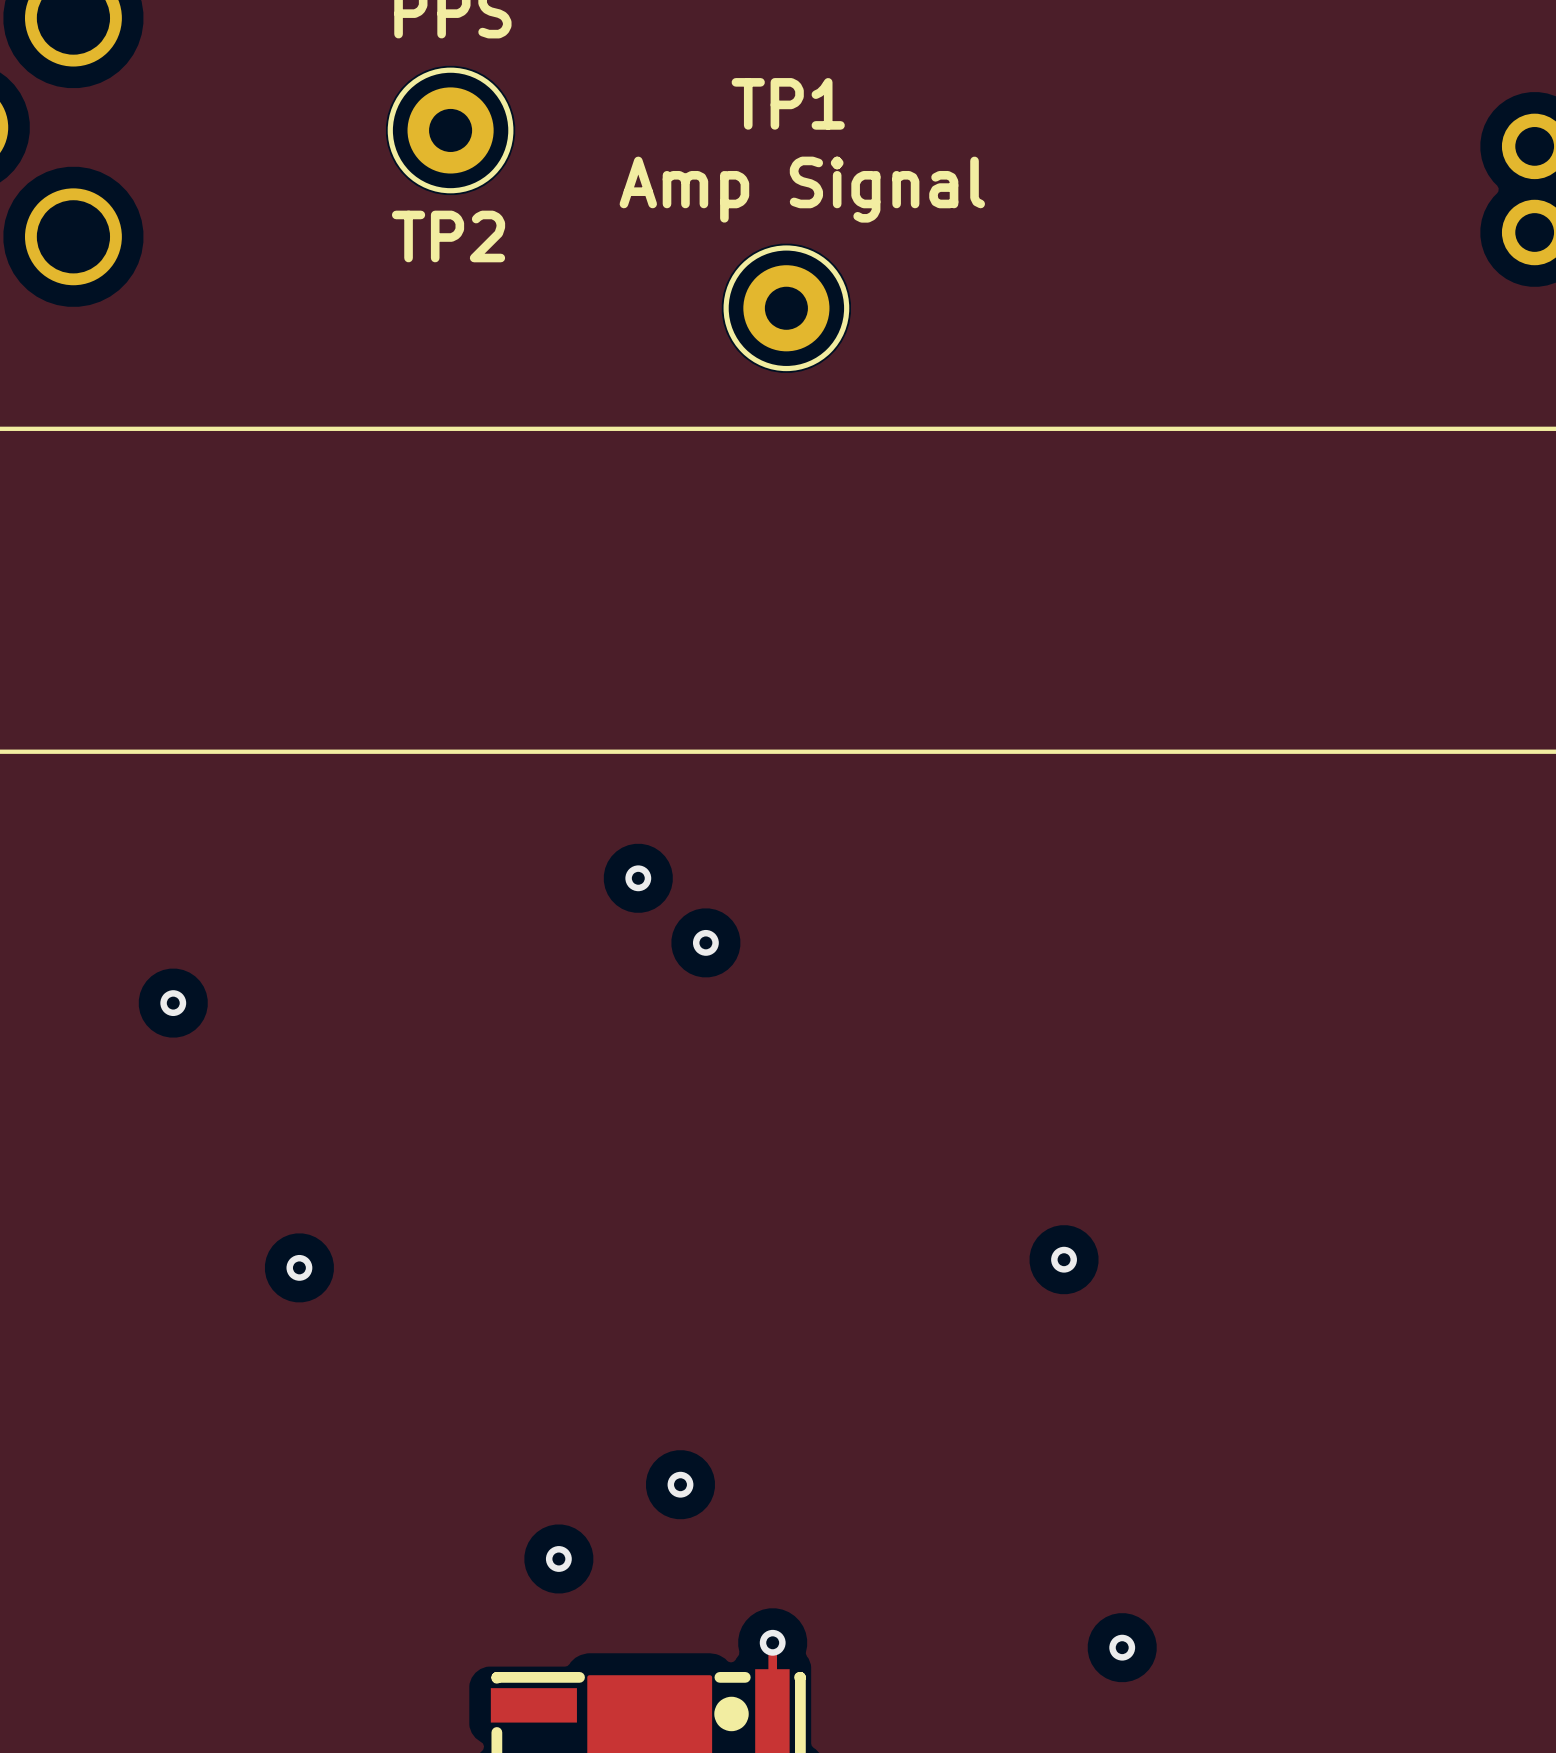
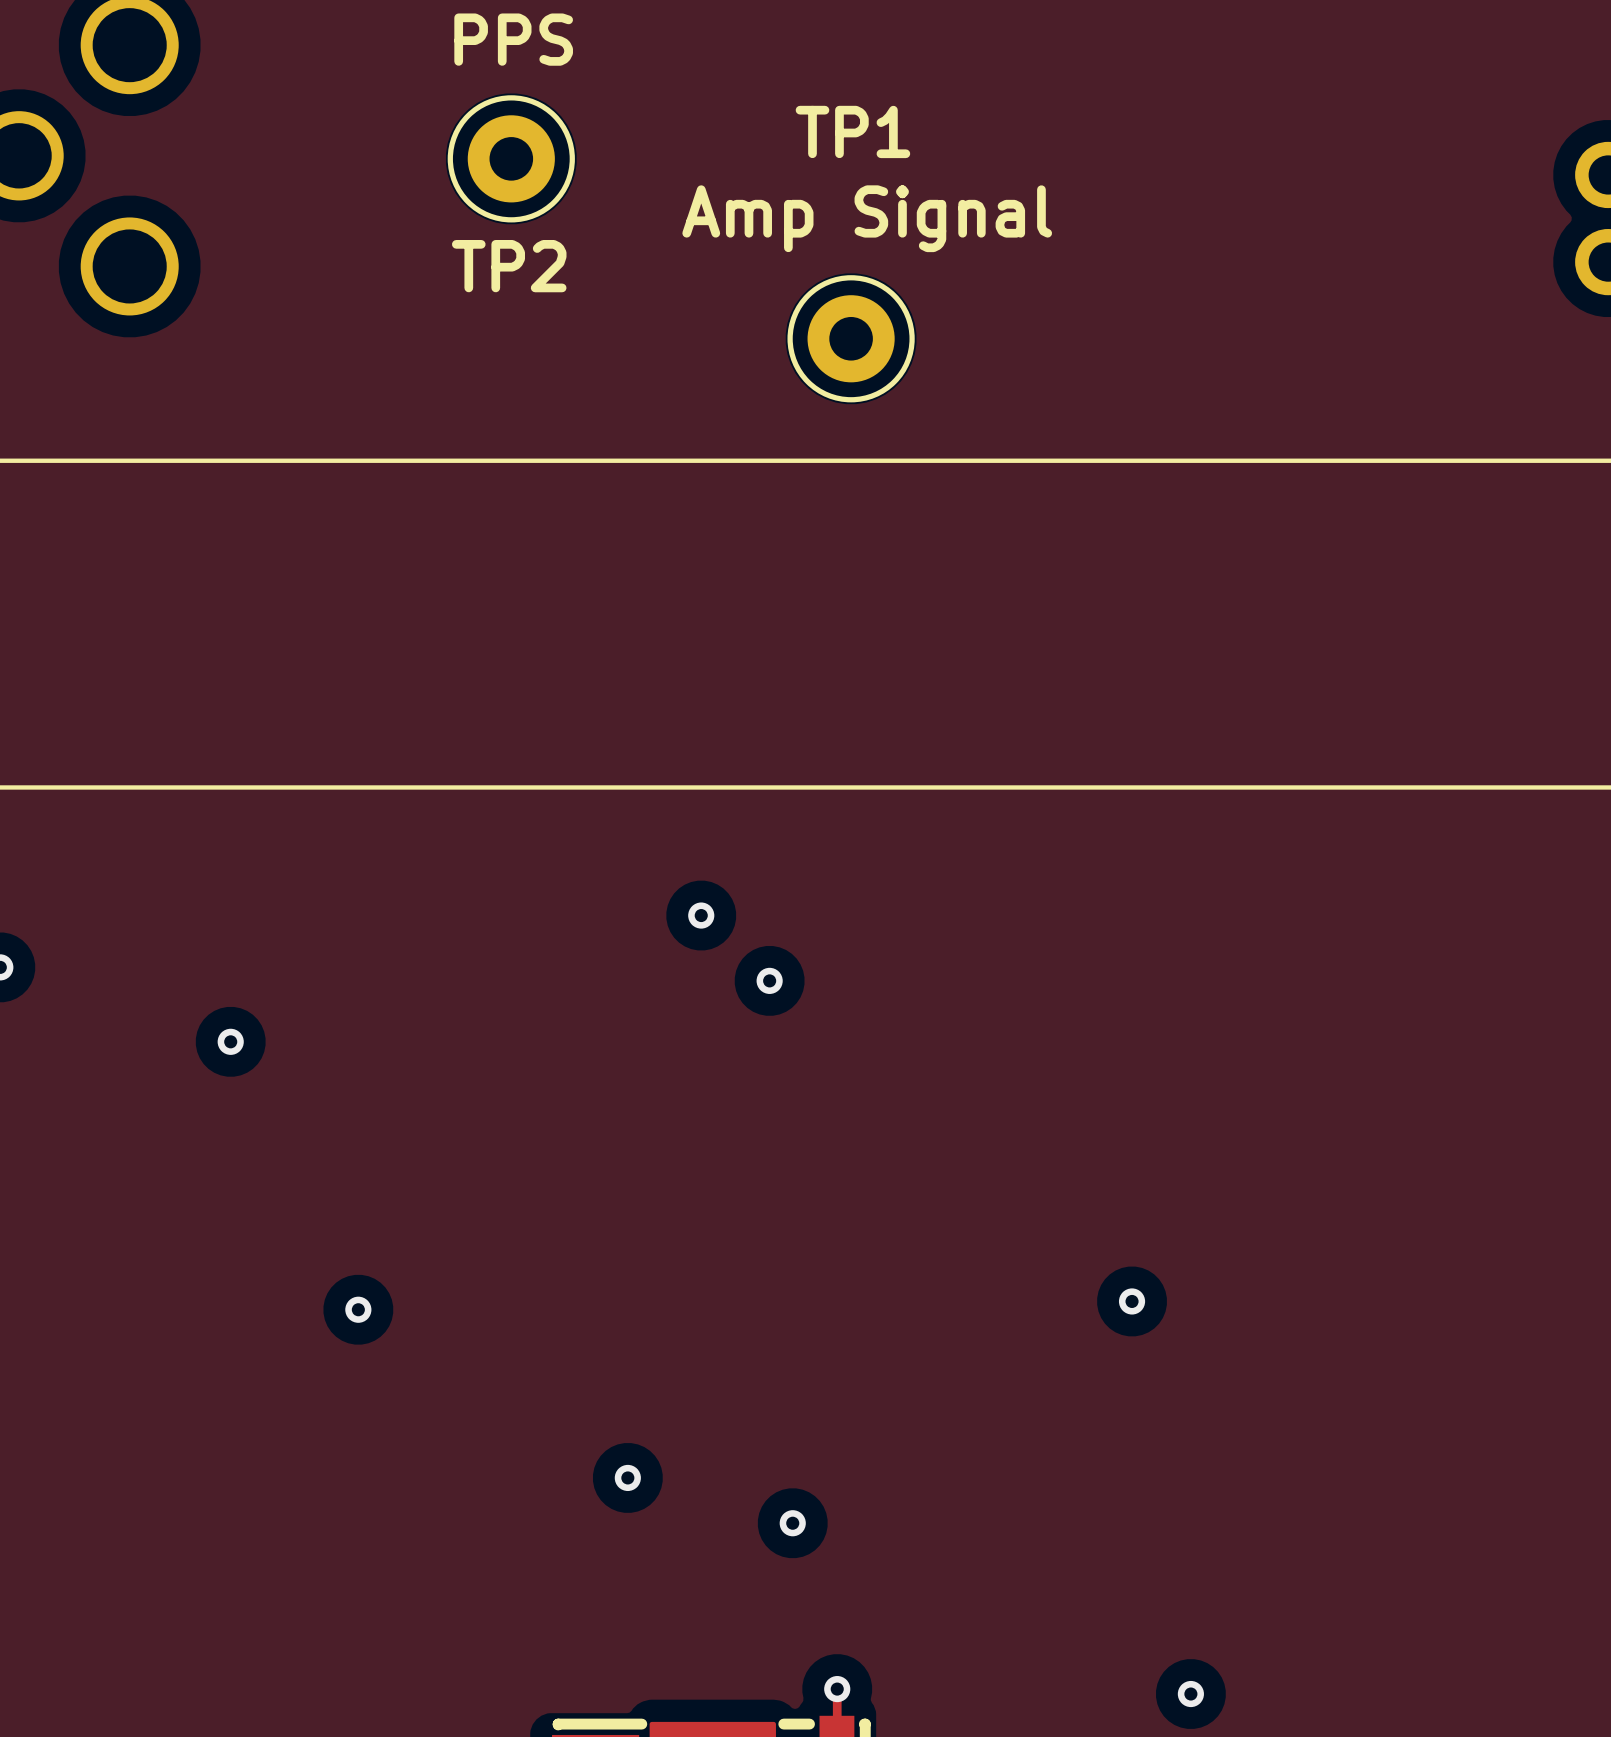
via: none -> (627, 1477)
via position: (680, 1484) -> (792, 1523)
via: (558, 1558) -> none

